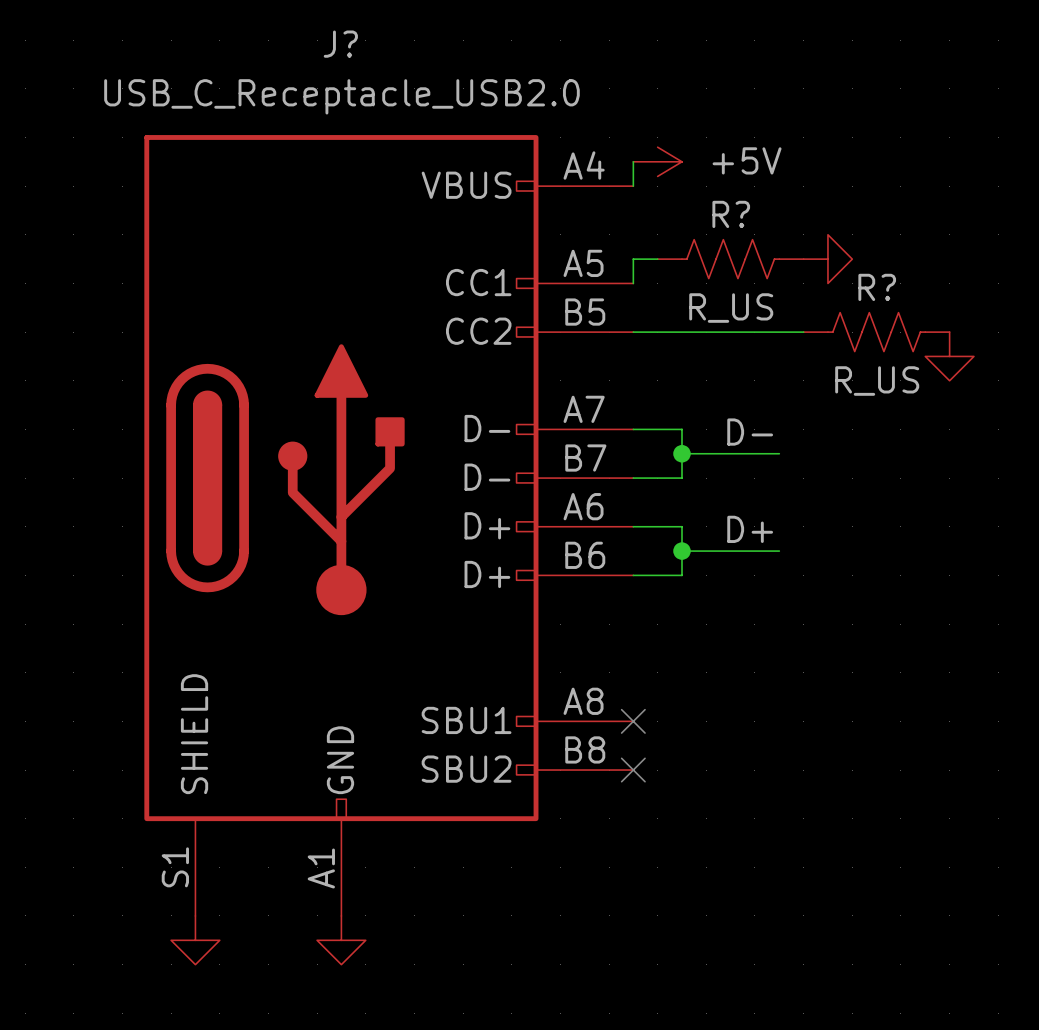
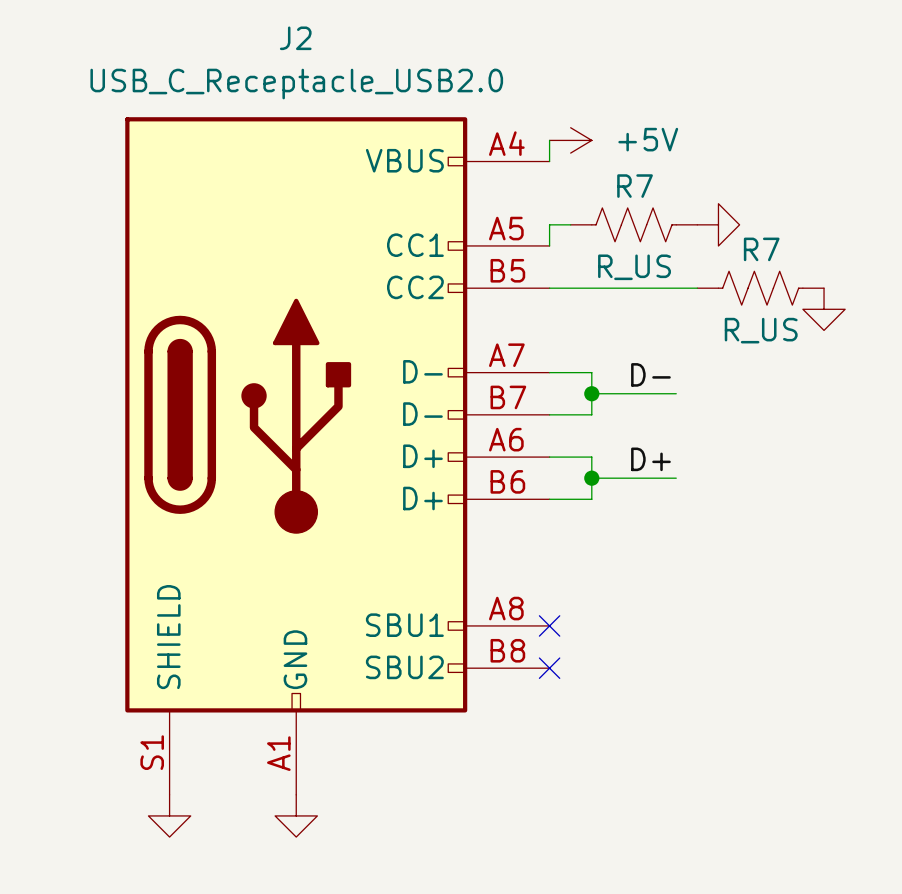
J? name: J? (340, 44) -> J2 (295, 38)
R? name: R? (731, 214) -> R7 (635, 186)
R? name: R? (877, 287) -> R7 (761, 249)

